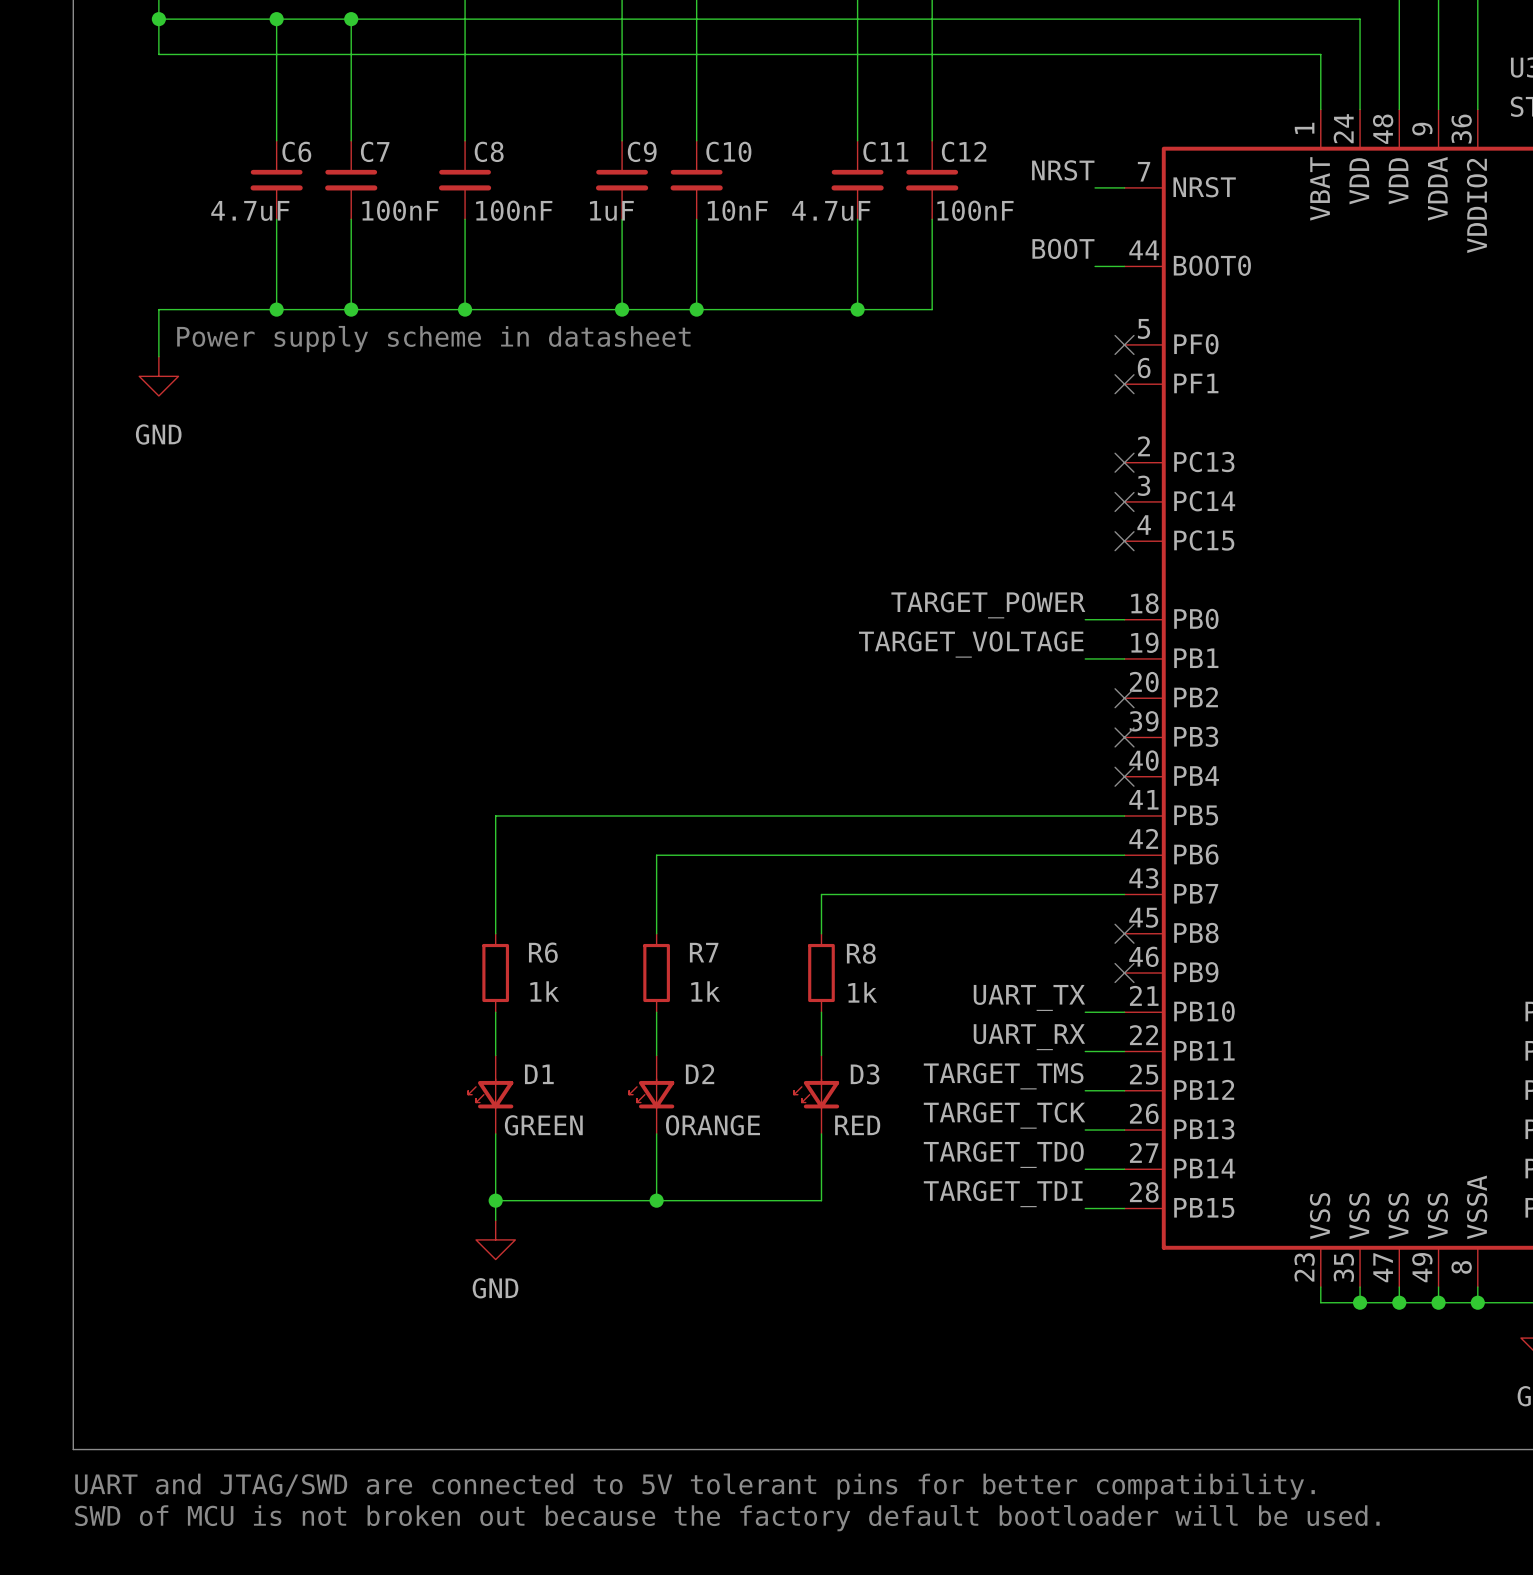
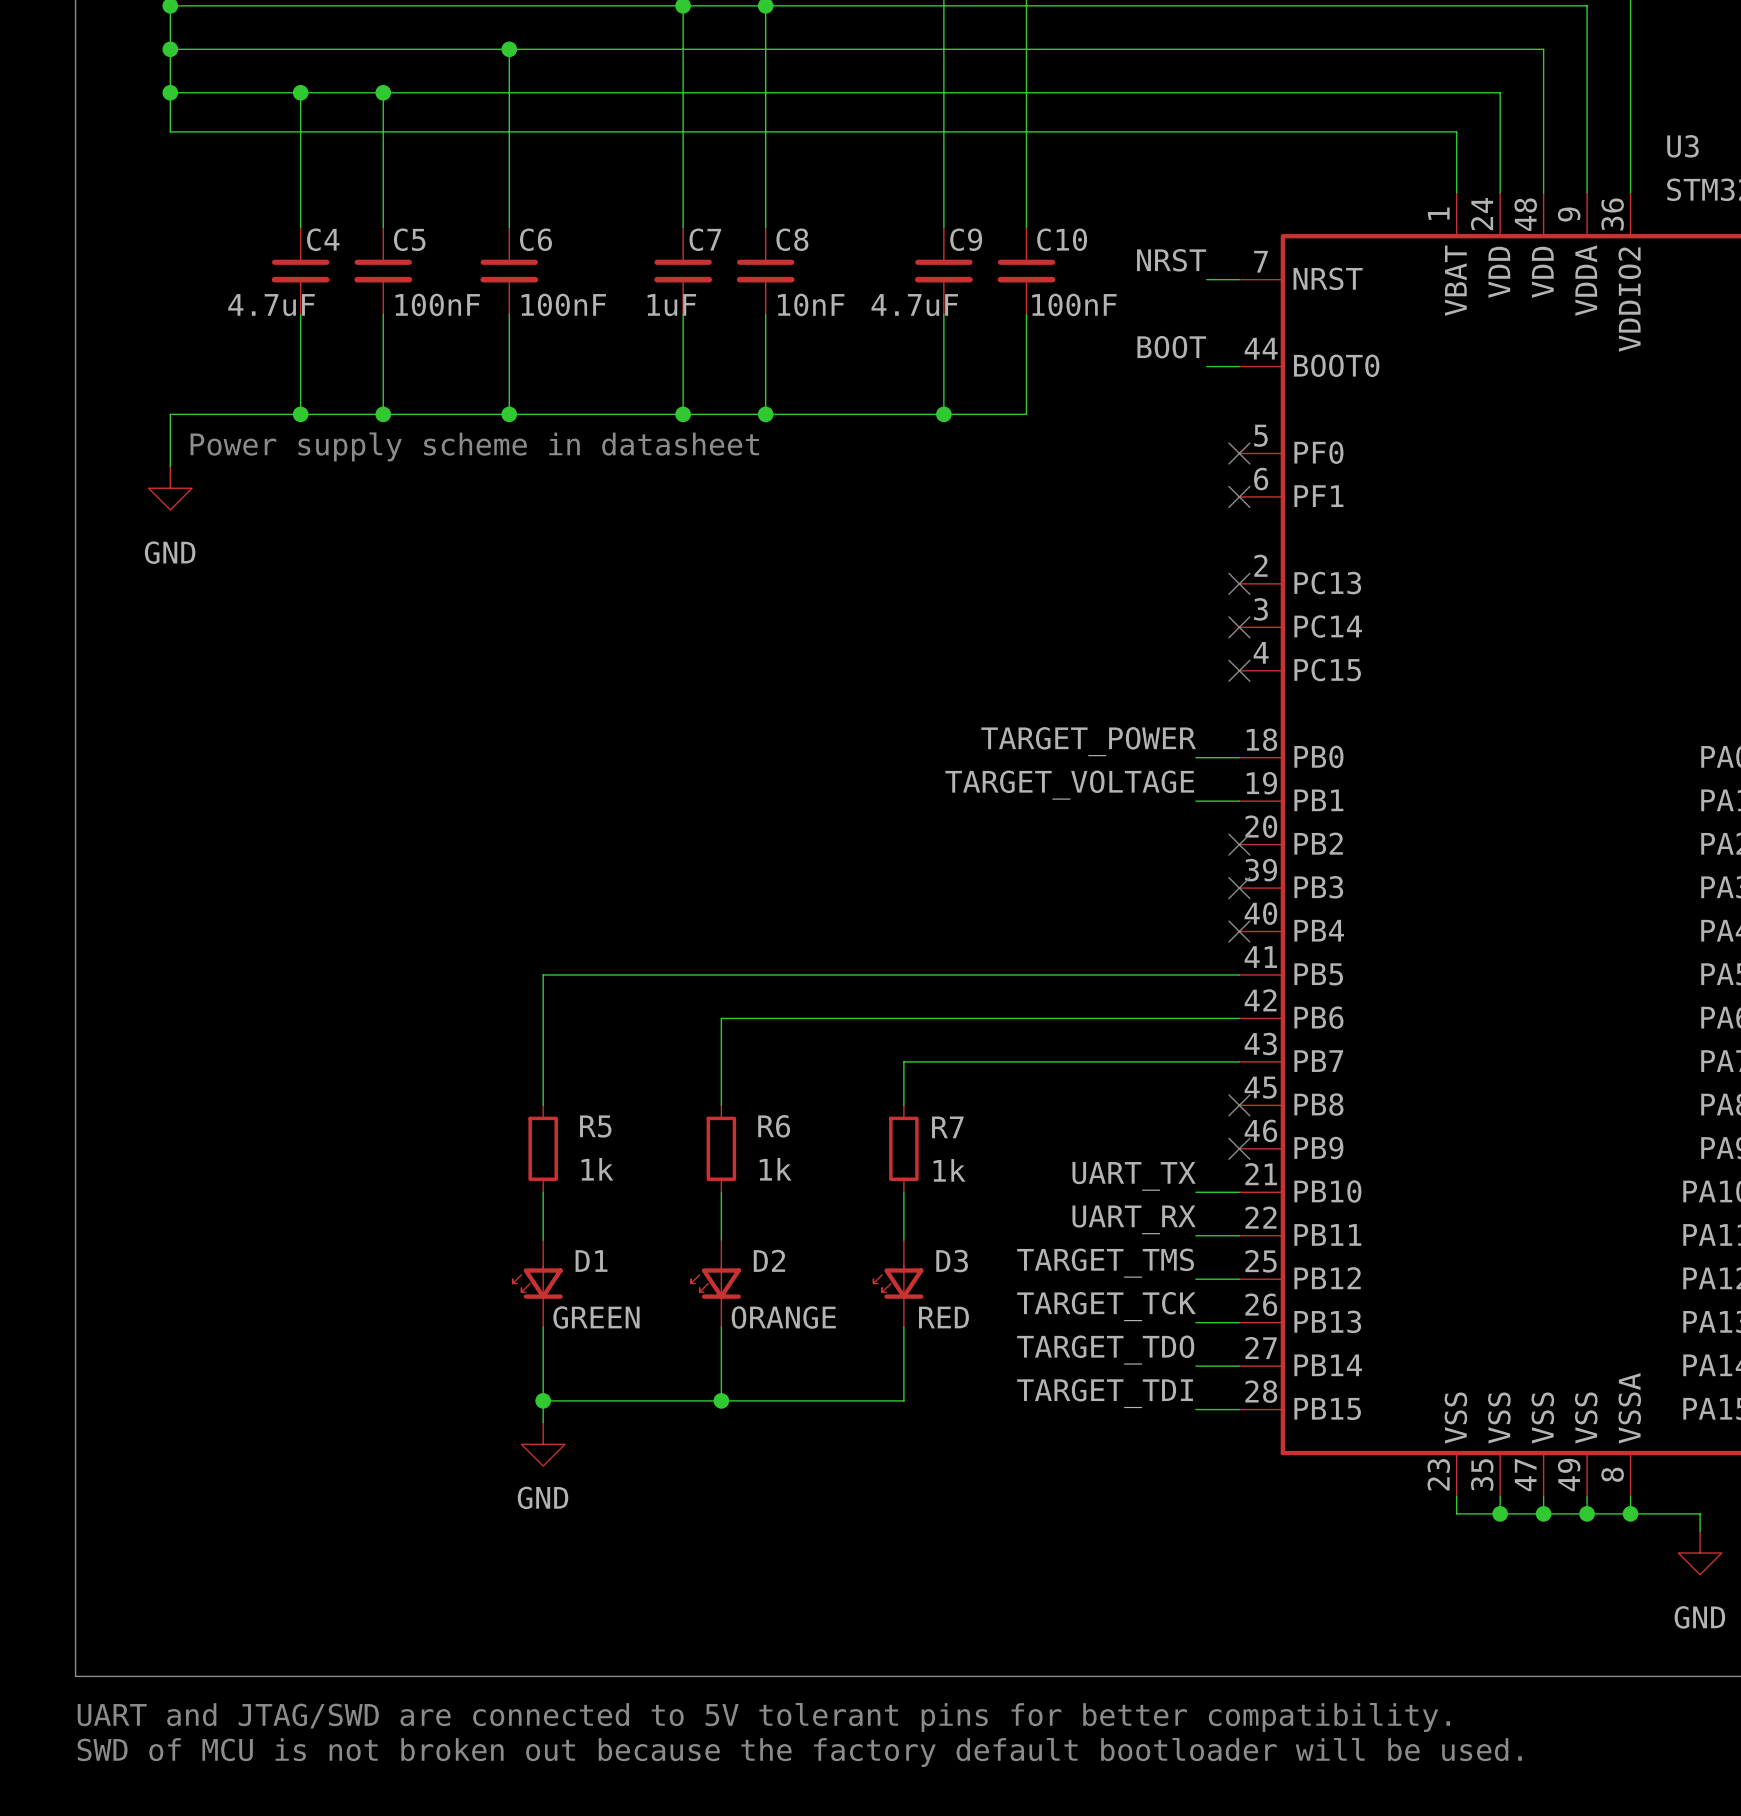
C6 name: C6 (296, 151) -> C4 (323, 239)
C7 name: C7 (375, 151) -> C5 (409, 239)
C8 name: C8 (489, 151) -> C6 (535, 239)
C9 name: C9 (642, 151) -> C7 (705, 239)
C10 name: C10 (728, 151) -> C8 (792, 239)
C11 name: C11 (885, 151) -> C9 (966, 239)
C12 name: C12 (964, 151) -> C10 (1062, 239)
R6 name: R6 (543, 952) -> R5 (595, 1126)
R7 name: R7 (704, 952) -> R6 (774, 1126)
R8 name: R8 (861, 953) -> R7 (947, 1127)

